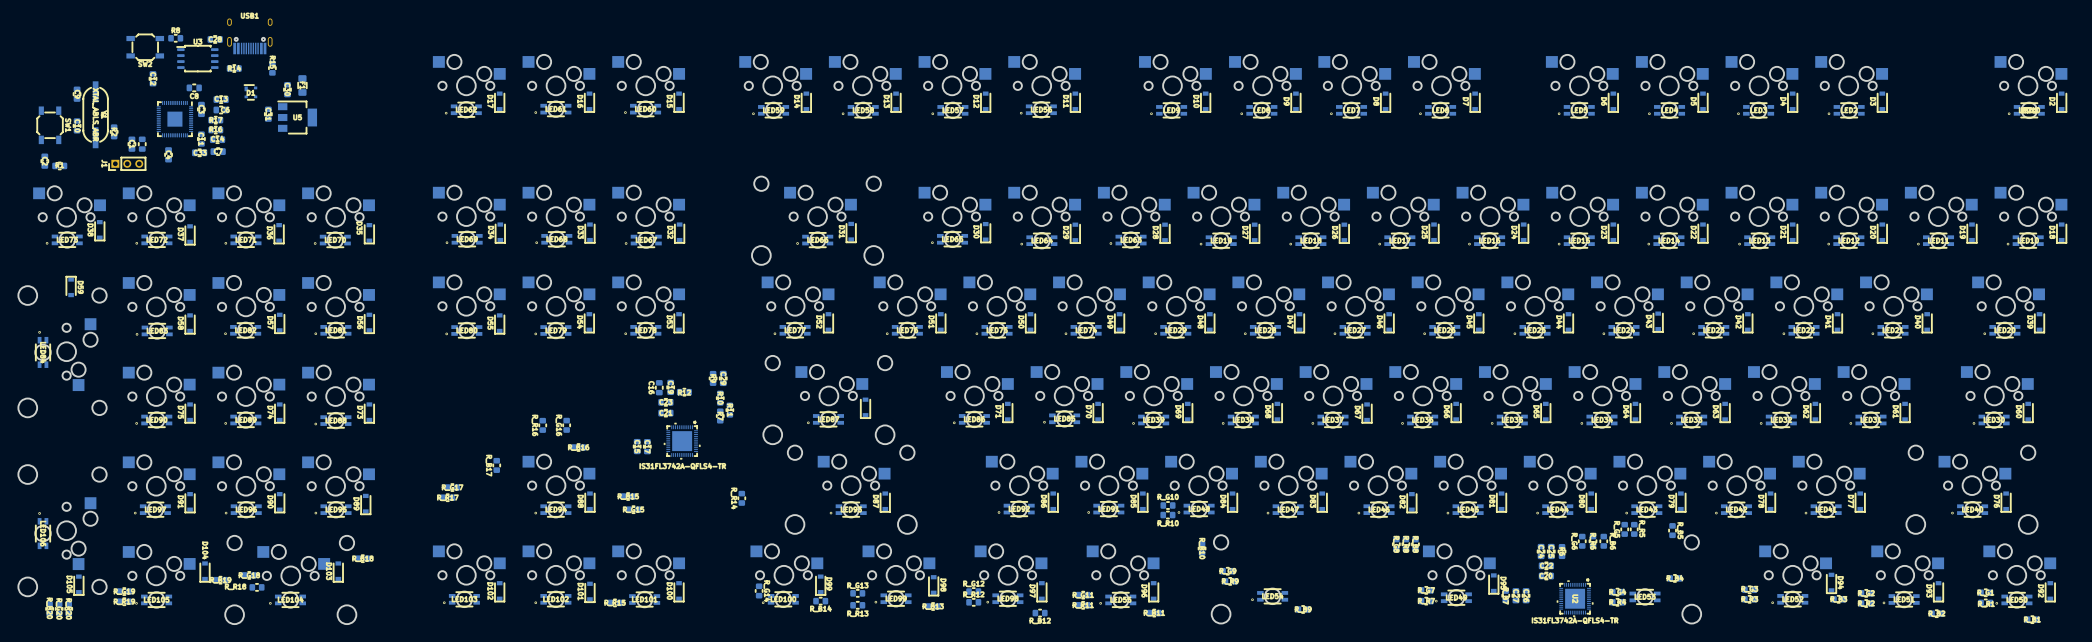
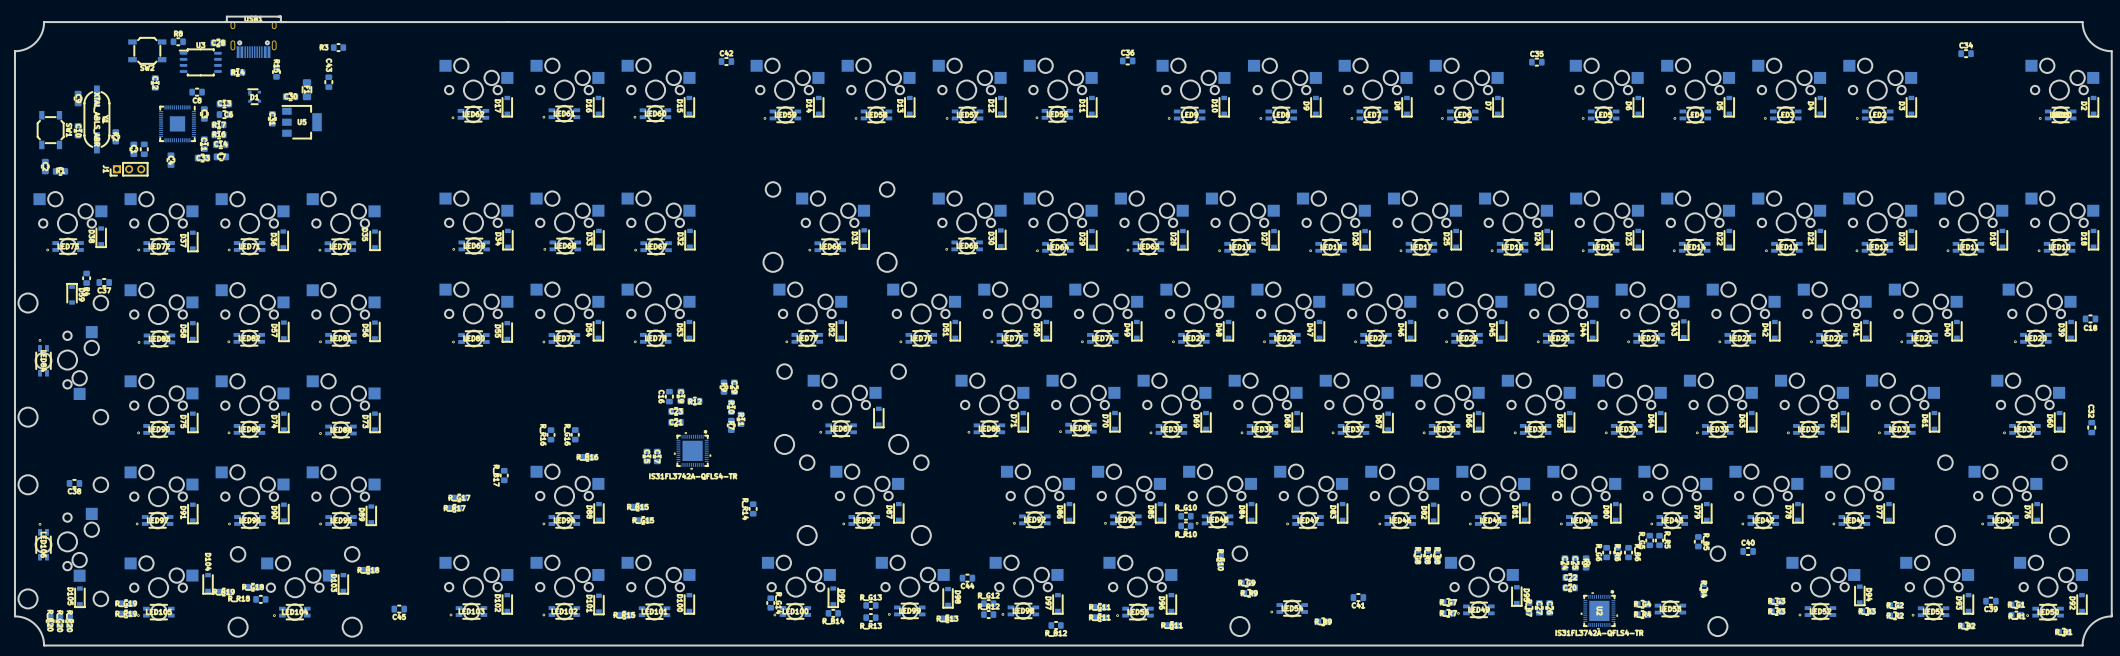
board edge: none -> (282, 22) (280, 16) (226, 16) (225, 22)
board edge: none -> (2082, 22) (44, 22) (41, 33) (35, 42) (26, 48) (14, 51) (14, 616) (26, 618) (35, 624) (41, 634) (44, 645) (2082, 645) (2084, 634) (2091, 624) (2100, 618) (2111, 616) (2111, 51) (2100, 48) (2091, 42) (2084, 33) (2082, 22)
part: none -> (338, 47)
part: none -> (1966, 53)
part: none -> (726, 61)
part: none -> (1127, 60)
part: none -> (1536, 62)
part: none -> (328, 82)
part rotation: 0° (287, 89) -> 90° clockwise (290, 96)
part: none -> (86, 278)
part: none -> (104, 282)
part: none -> (2090, 318)
part: none -> (2091, 427)
part: none -> (74, 483)
part: none -> (1748, 551)
part: none -> (967, 578)
part rotation: 0° (1674, 578) -> 90° clockwise (1703, 589)
part: none -> (1358, 597)
part: none -> (1990, 601)
part: none -> (399, 609)

